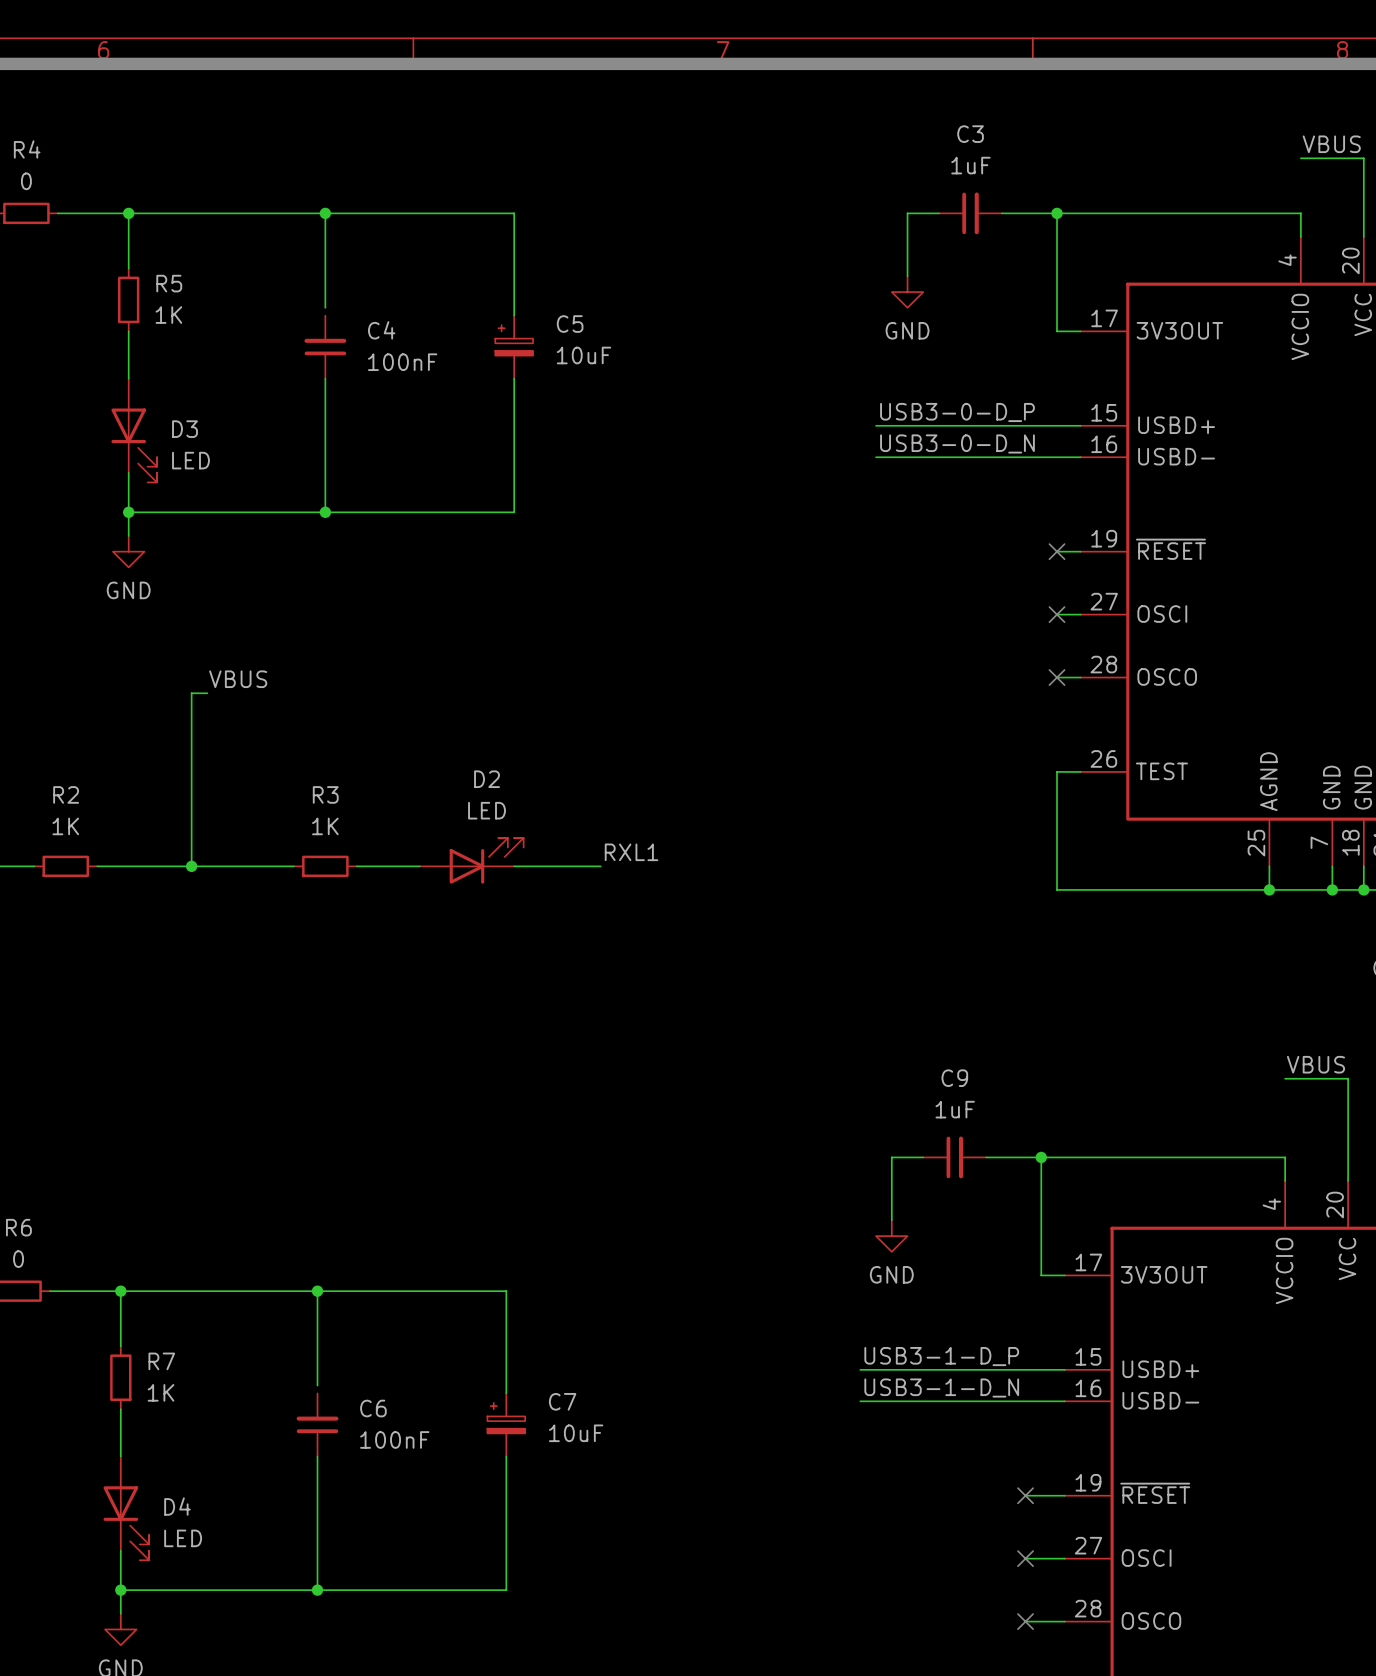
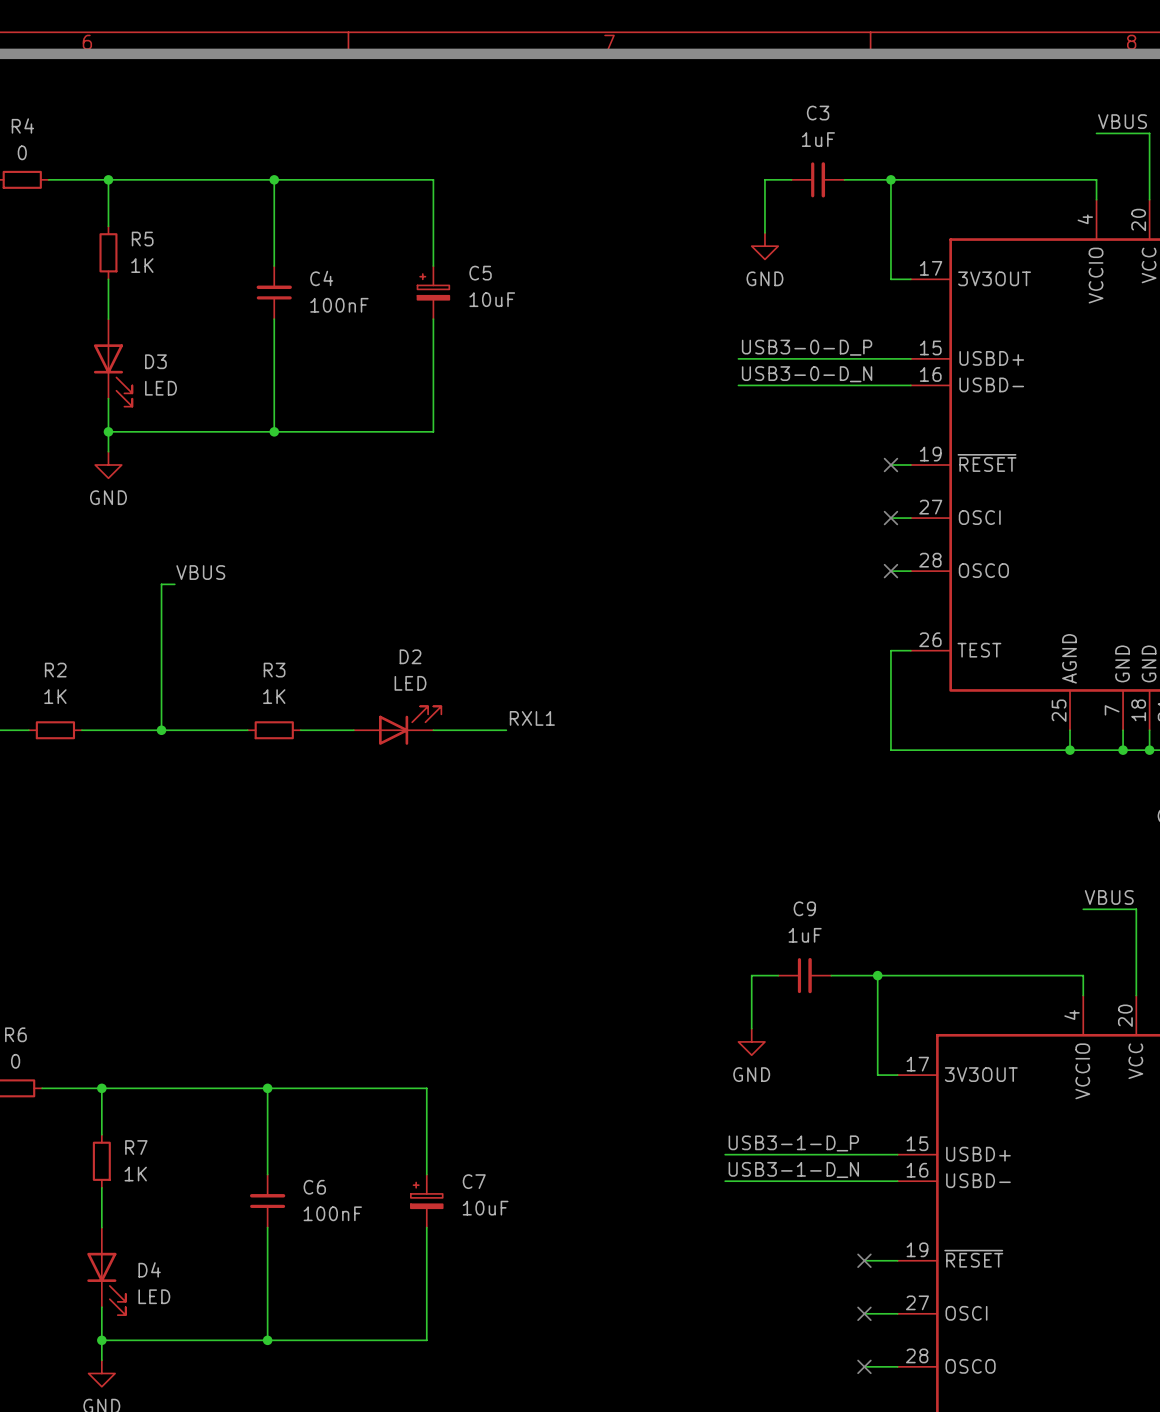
wire: none -> (274, 259) (274, 266)
wire: none -> (267, 1167) (267, 1174)

